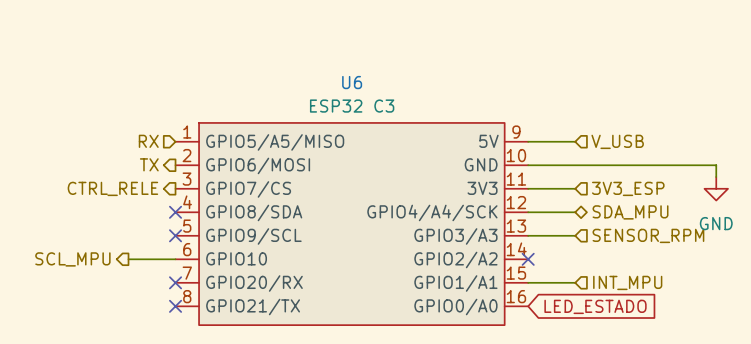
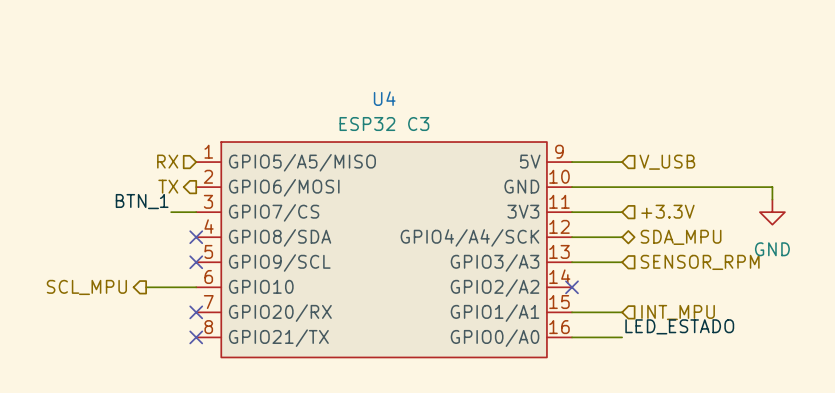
U6 name: U6 (352, 82) -> U4 (384, 98)
label: none -> BTN_1 (142, 201)
hierarchical label: CTRL_RELE (112, 188) -> none
wire: none -> (171, 212) (196, 212)
hierarchical label: 3V3_ESP (628, 188) -> +3.3V (667, 211)
label: none -> LED_ESTADO (679, 326)
wire: none -> (572, 337) (622, 337)
global label: LED_ESTADO (595, 306) -> none

